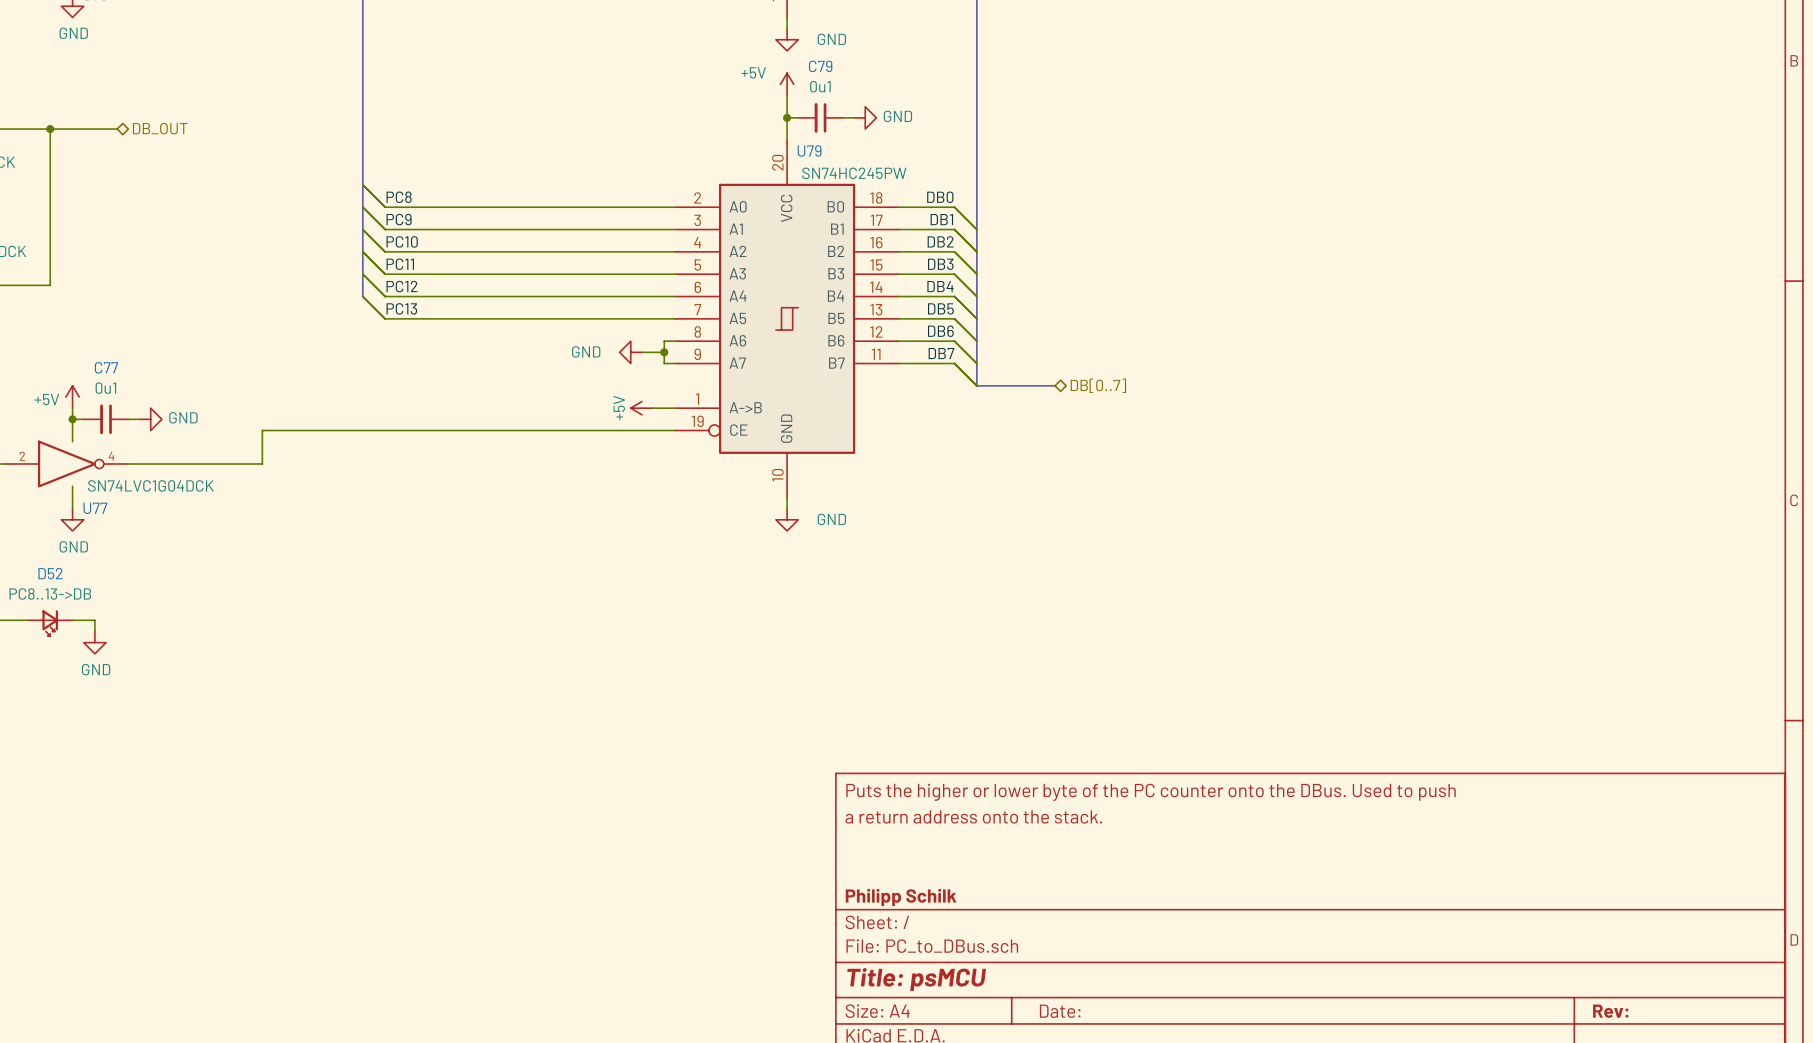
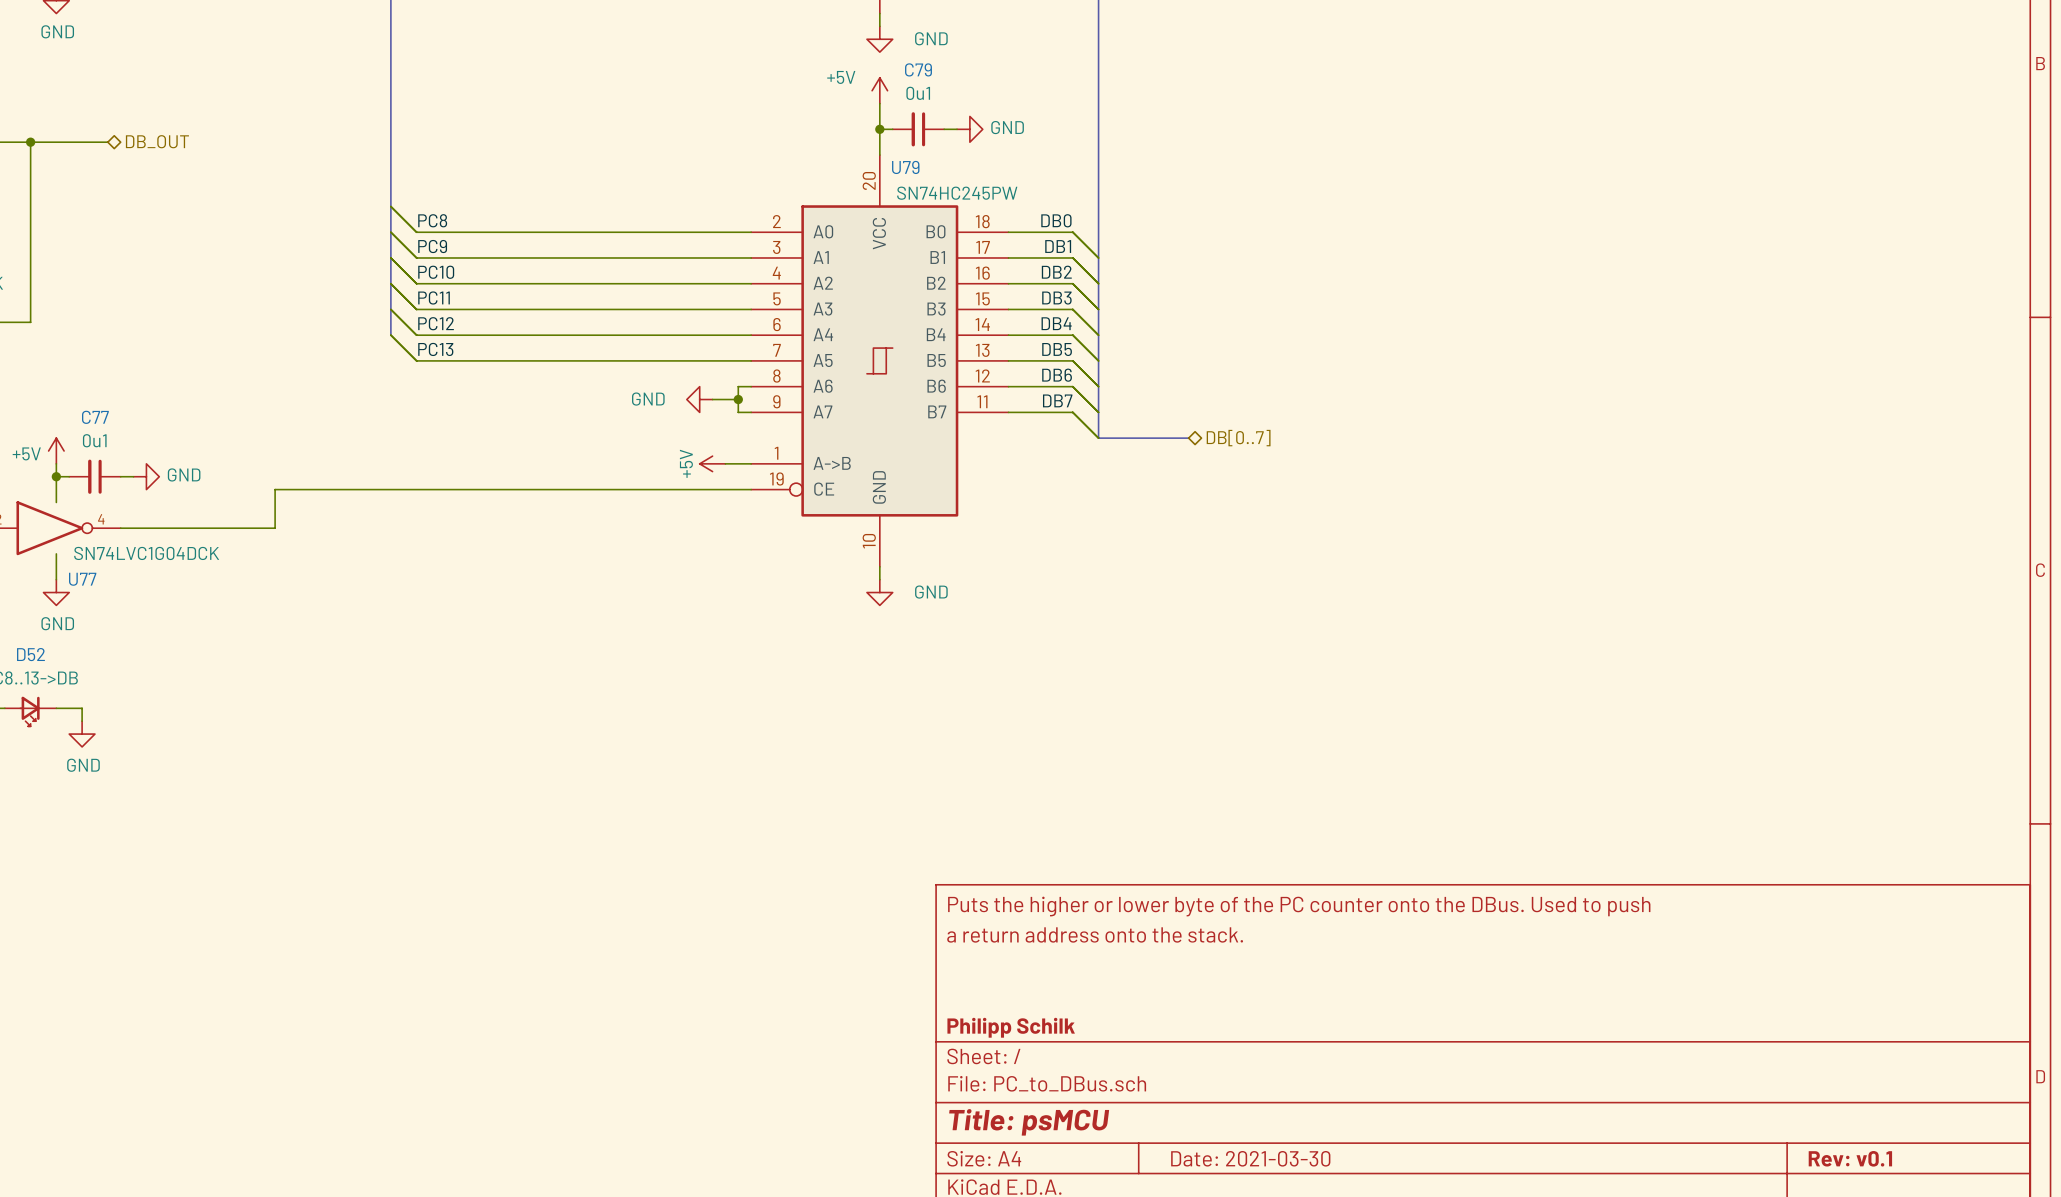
title block: Date: (1060, 1011) -> Date: 2021-03-30 (1250, 1158)
title block: Rev: (1610, 1011) -> Rev: v0.1 (1850, 1158)

